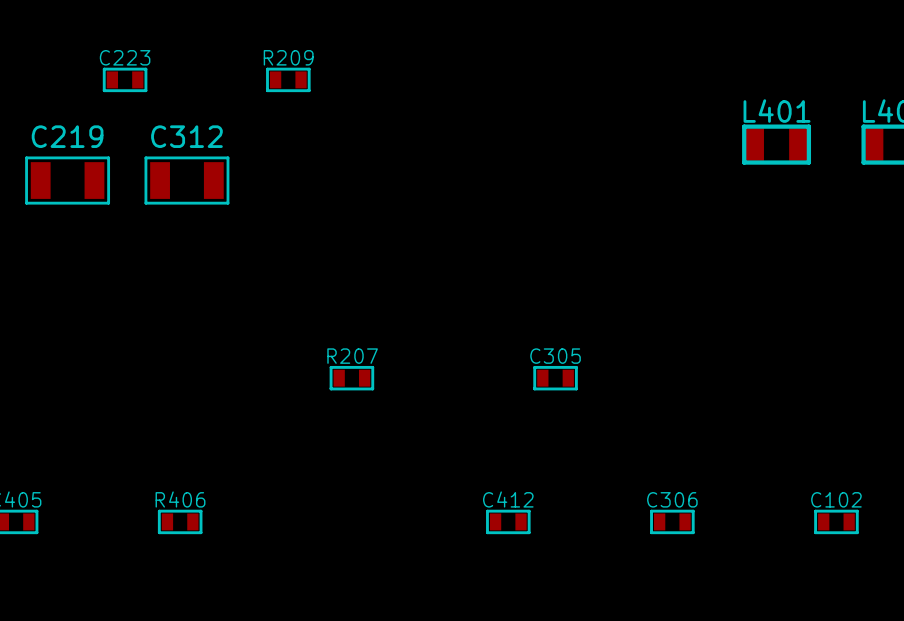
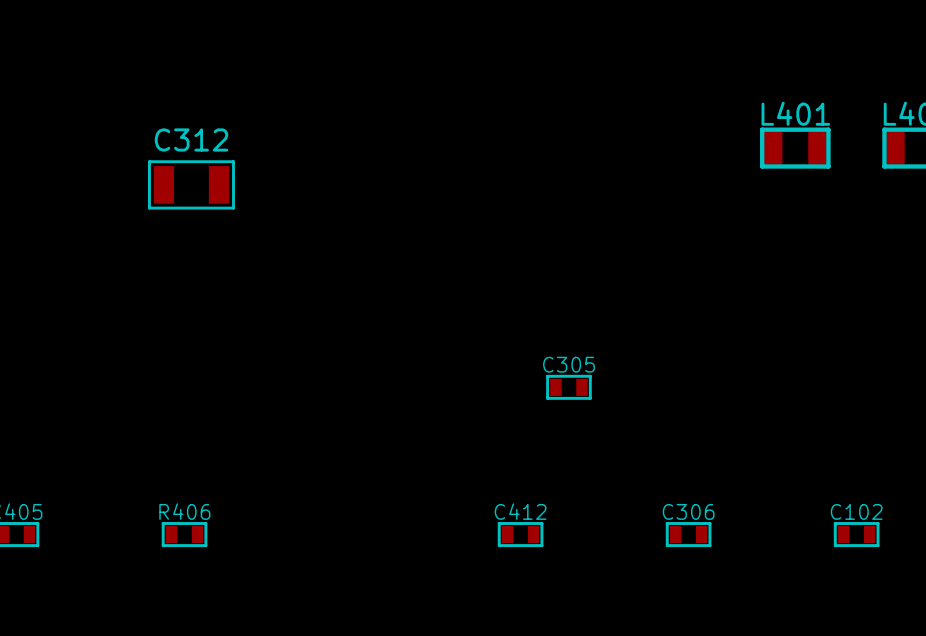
C223: (125, 79) -> none
R209: (288, 79) -> none
C219: (67, 180) -> none
R207: (351, 378) -> none

